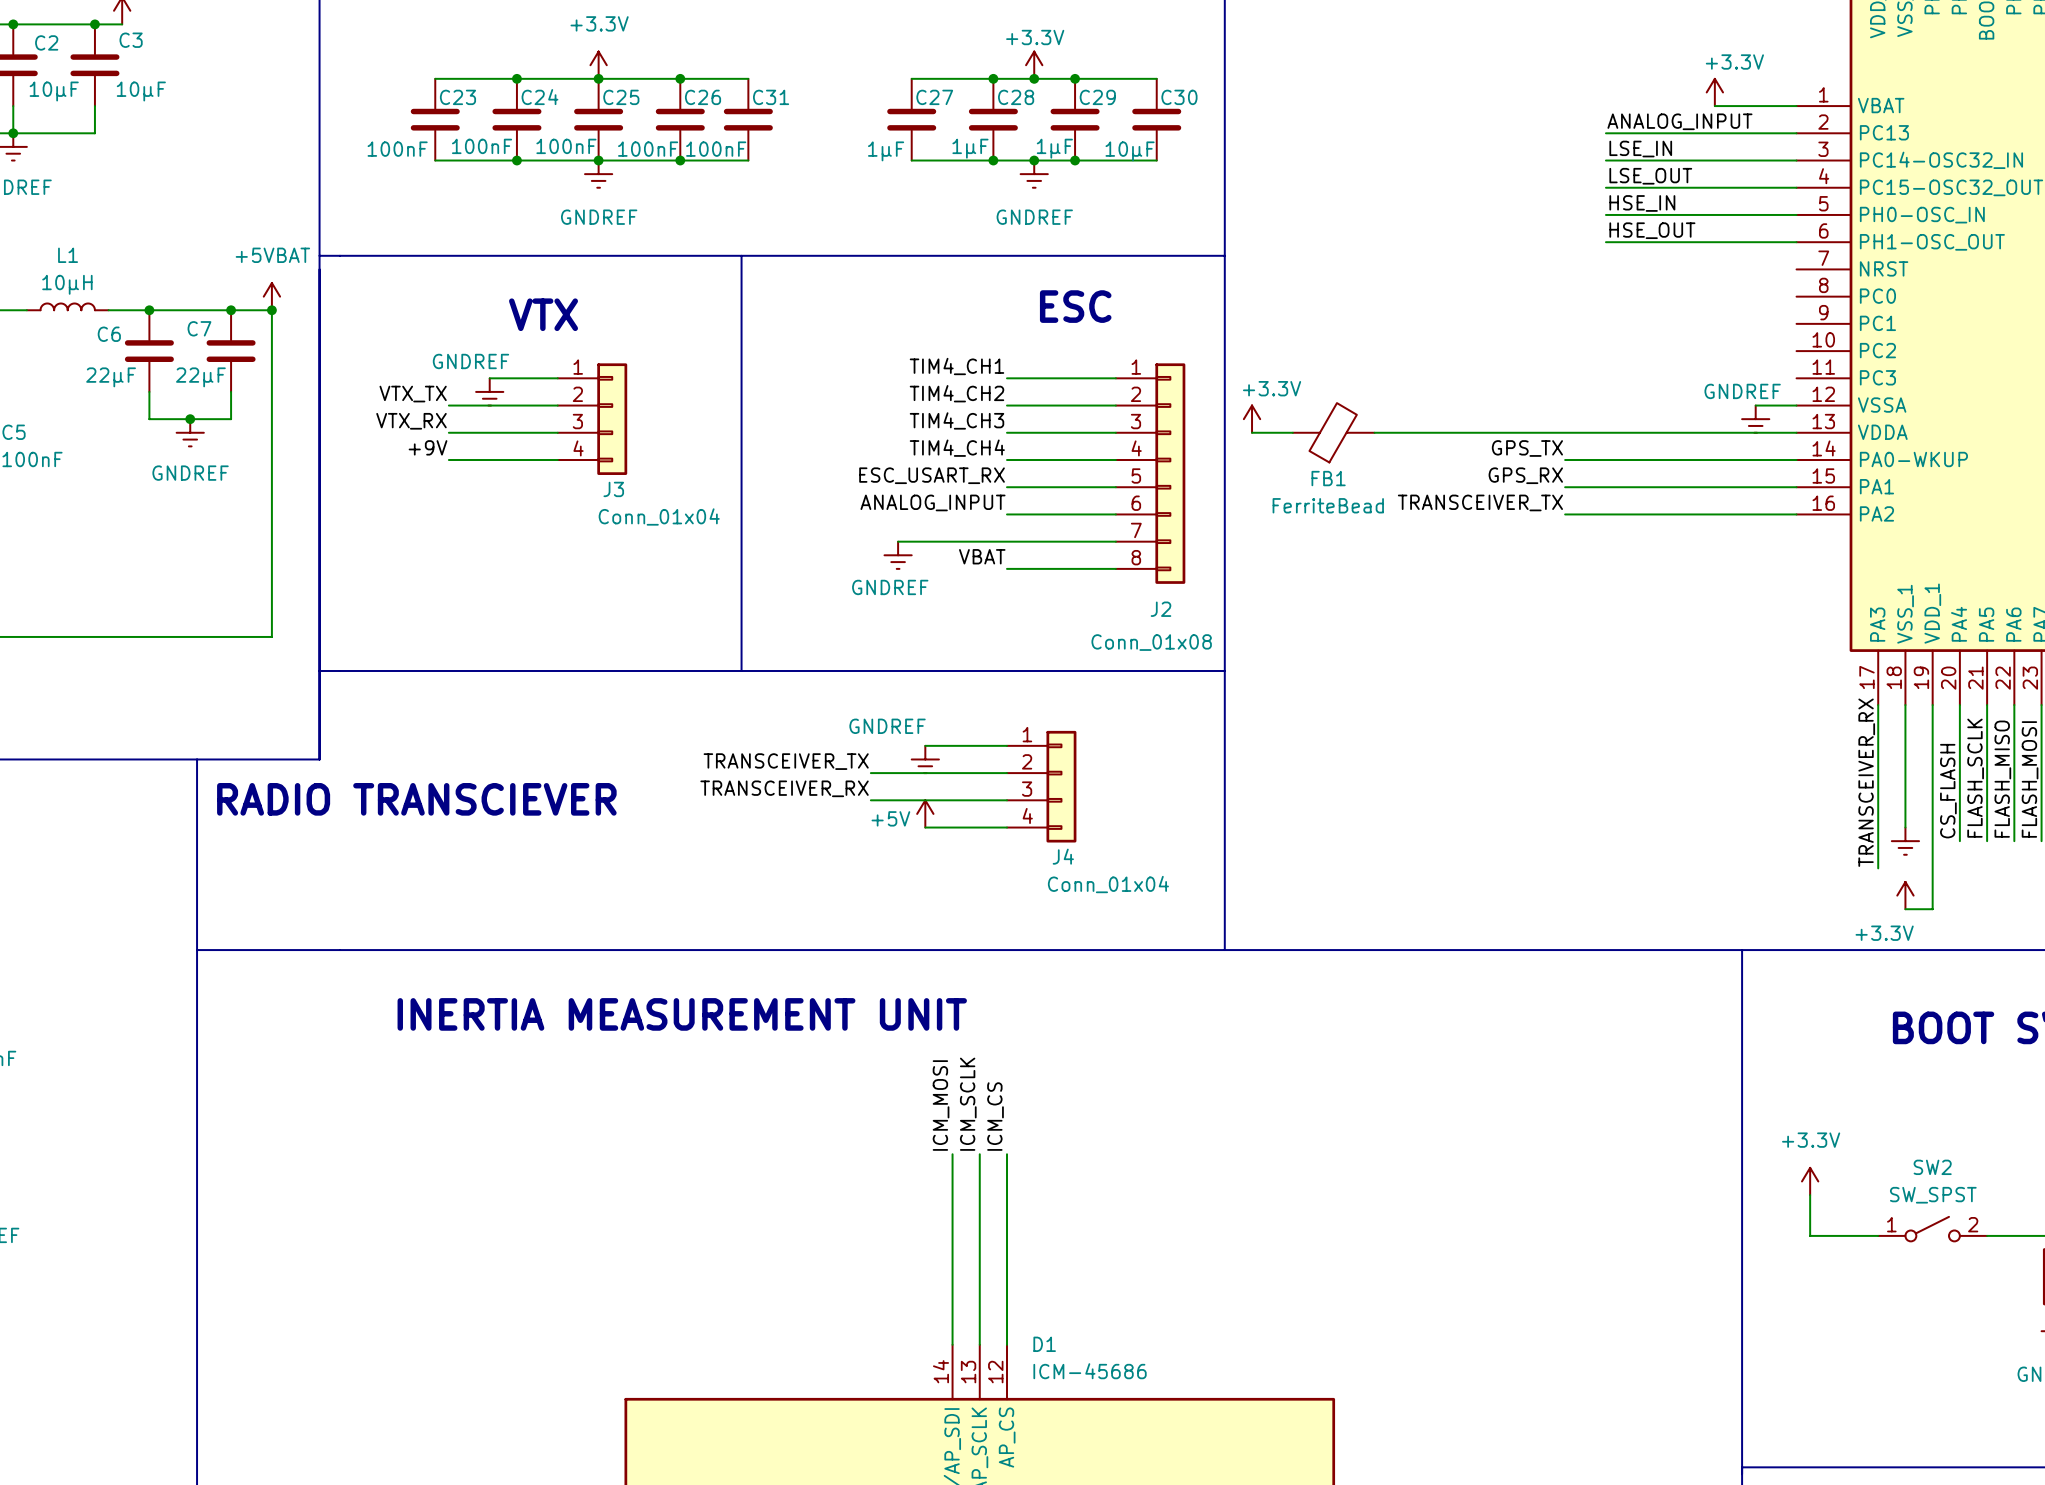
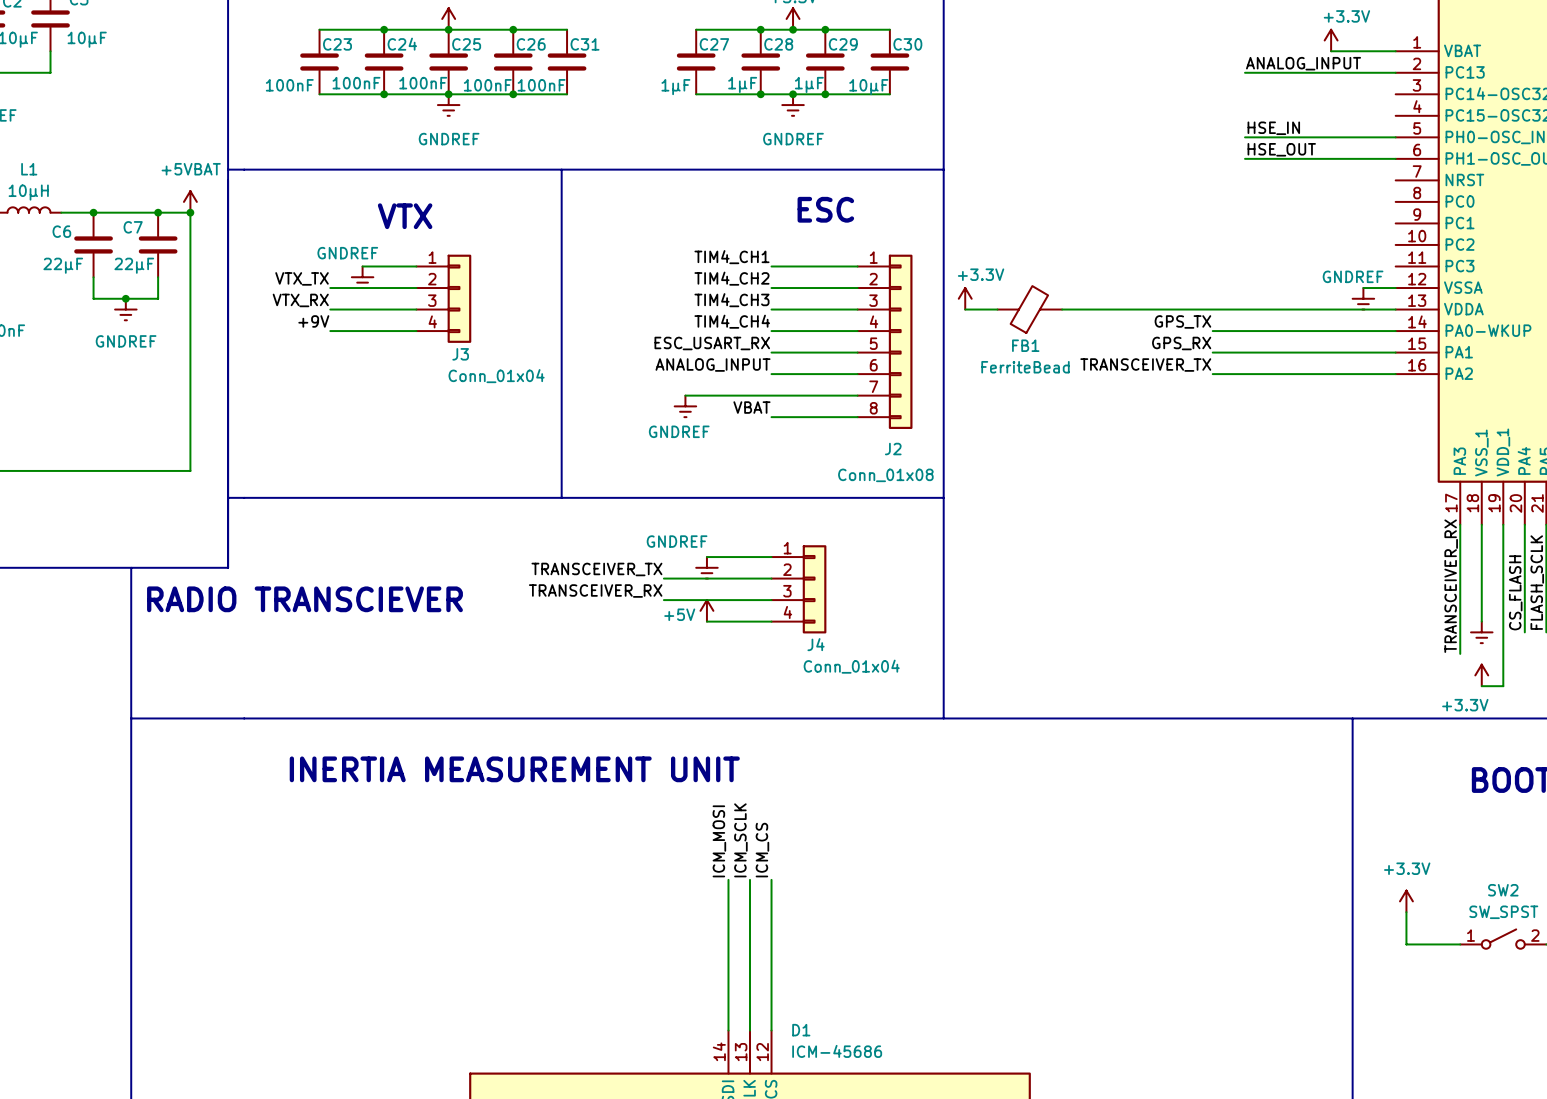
label: LSE_IN (1640, 149) -> none
wire: (1605, 160) (1796, 160) -> none
label: LSE_OUT (1650, 176) -> none
wire: (1605, 187) (1796, 187) -> none

